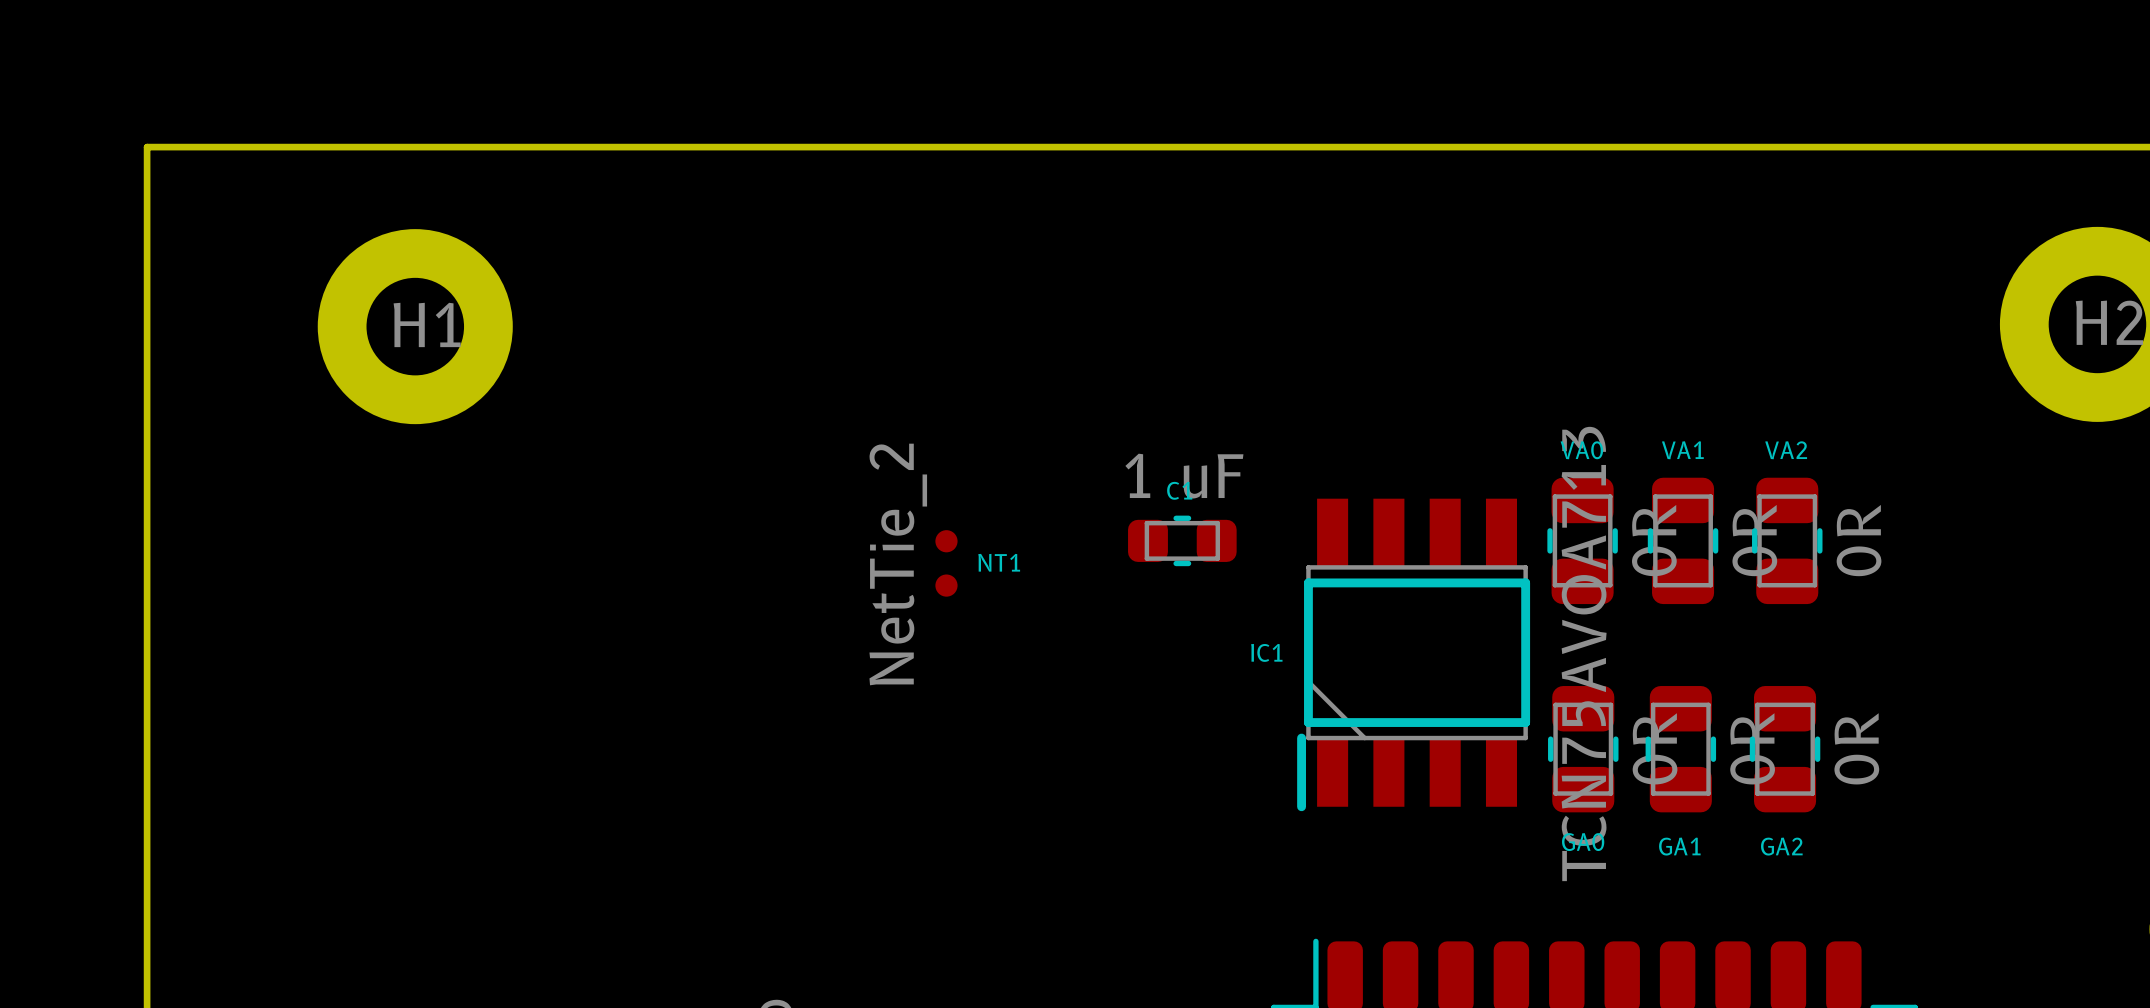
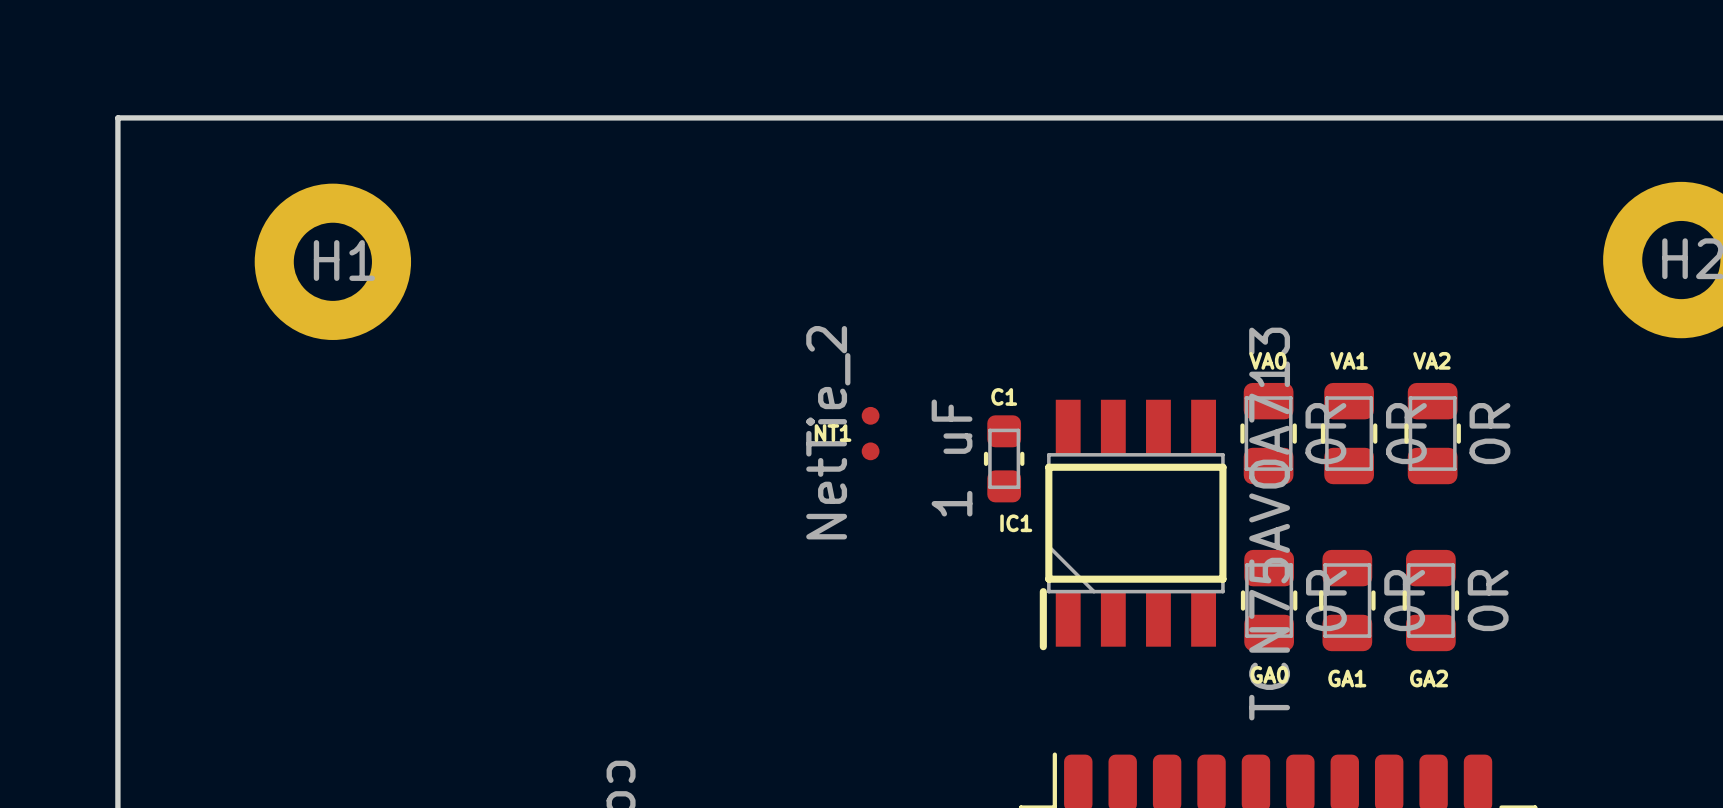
C1 value position: 1 uF (1184, 476) -> 1 uF (952, 458)
C1 rotation: 0° (1182, 540) -> 90° clockwise (1004, 458)
C1 position: (1182, 540) -> (1004, 458)
NT1 name position: NT1 (999, 562) -> NT1 (833, 433)
NT1 position: (946, 563) -> (870, 433)

